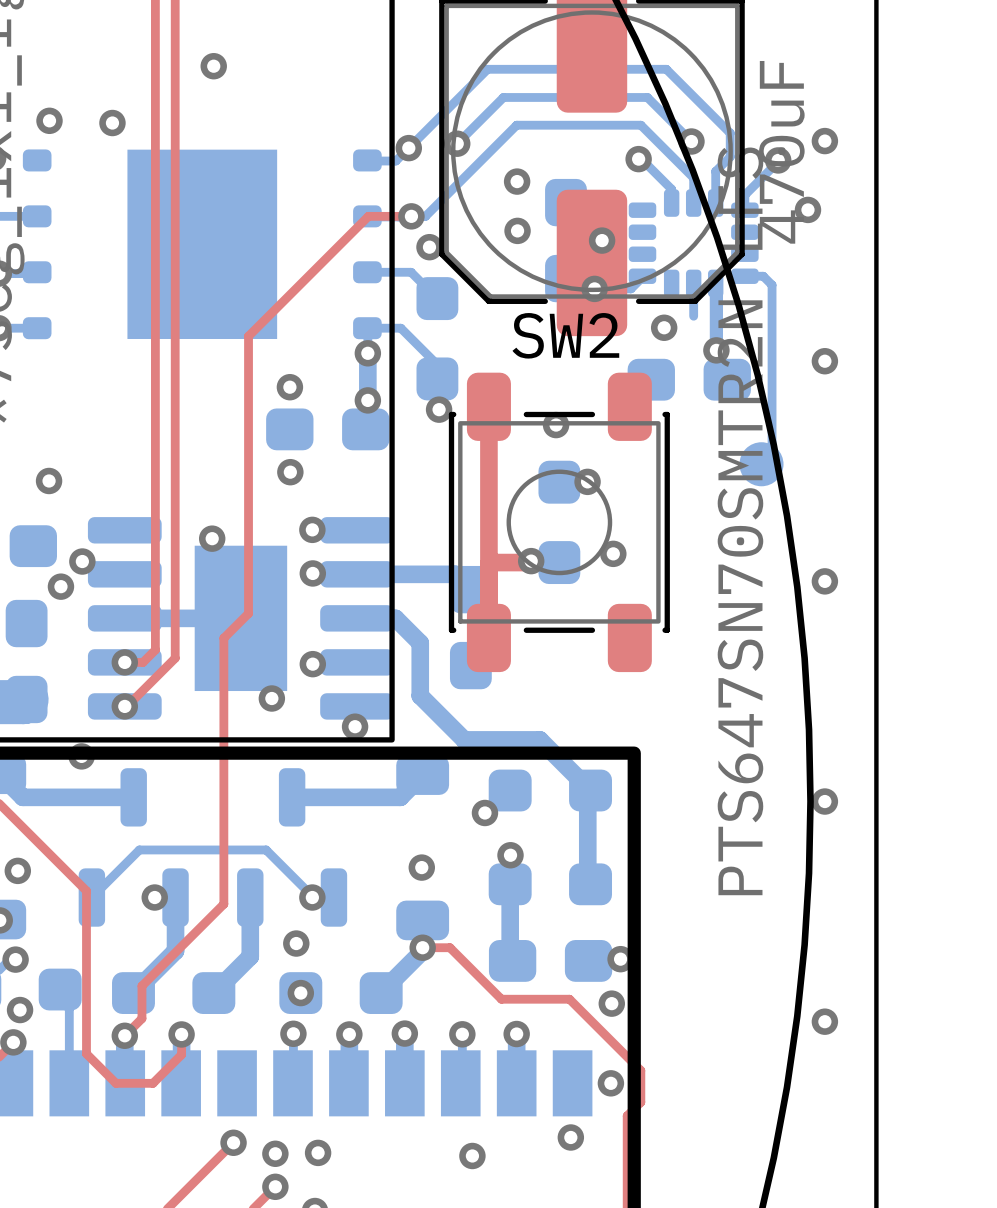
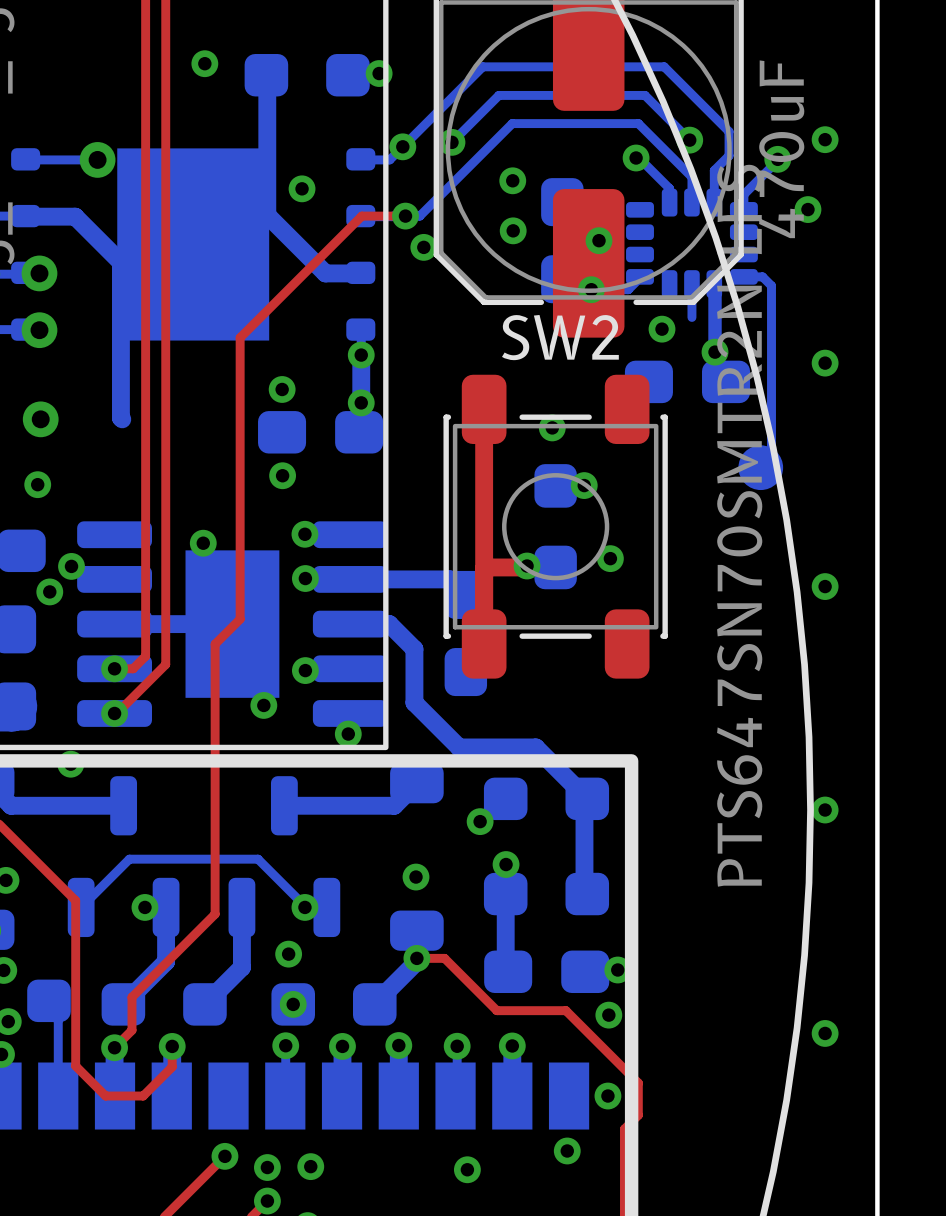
via: none -> (379, 73)
part: none -> (307, 75)
via: (49, 120) -> none
via: (112, 123) -> none
bottom track: none -> (39, 159) (97, 159)
via: none -> (97, 159)
via: none -> (302, 188)
bottom track: none -> (39, 216) (75, 216) (120, 262) (122, 419)
via: none -> (39, 273)
bottom track: (367, 272) (411, 272) (437, 298) -> (361, 273) (325, 273) (267, 215) (266, 75)
via: none -> (39, 330)
bottom track: (367, 328) (400, 328) (437, 364) (439, 409) -> none
part: (437, 338) -> none
via: (439, 409) -> none
via: none -> (40, 419)

